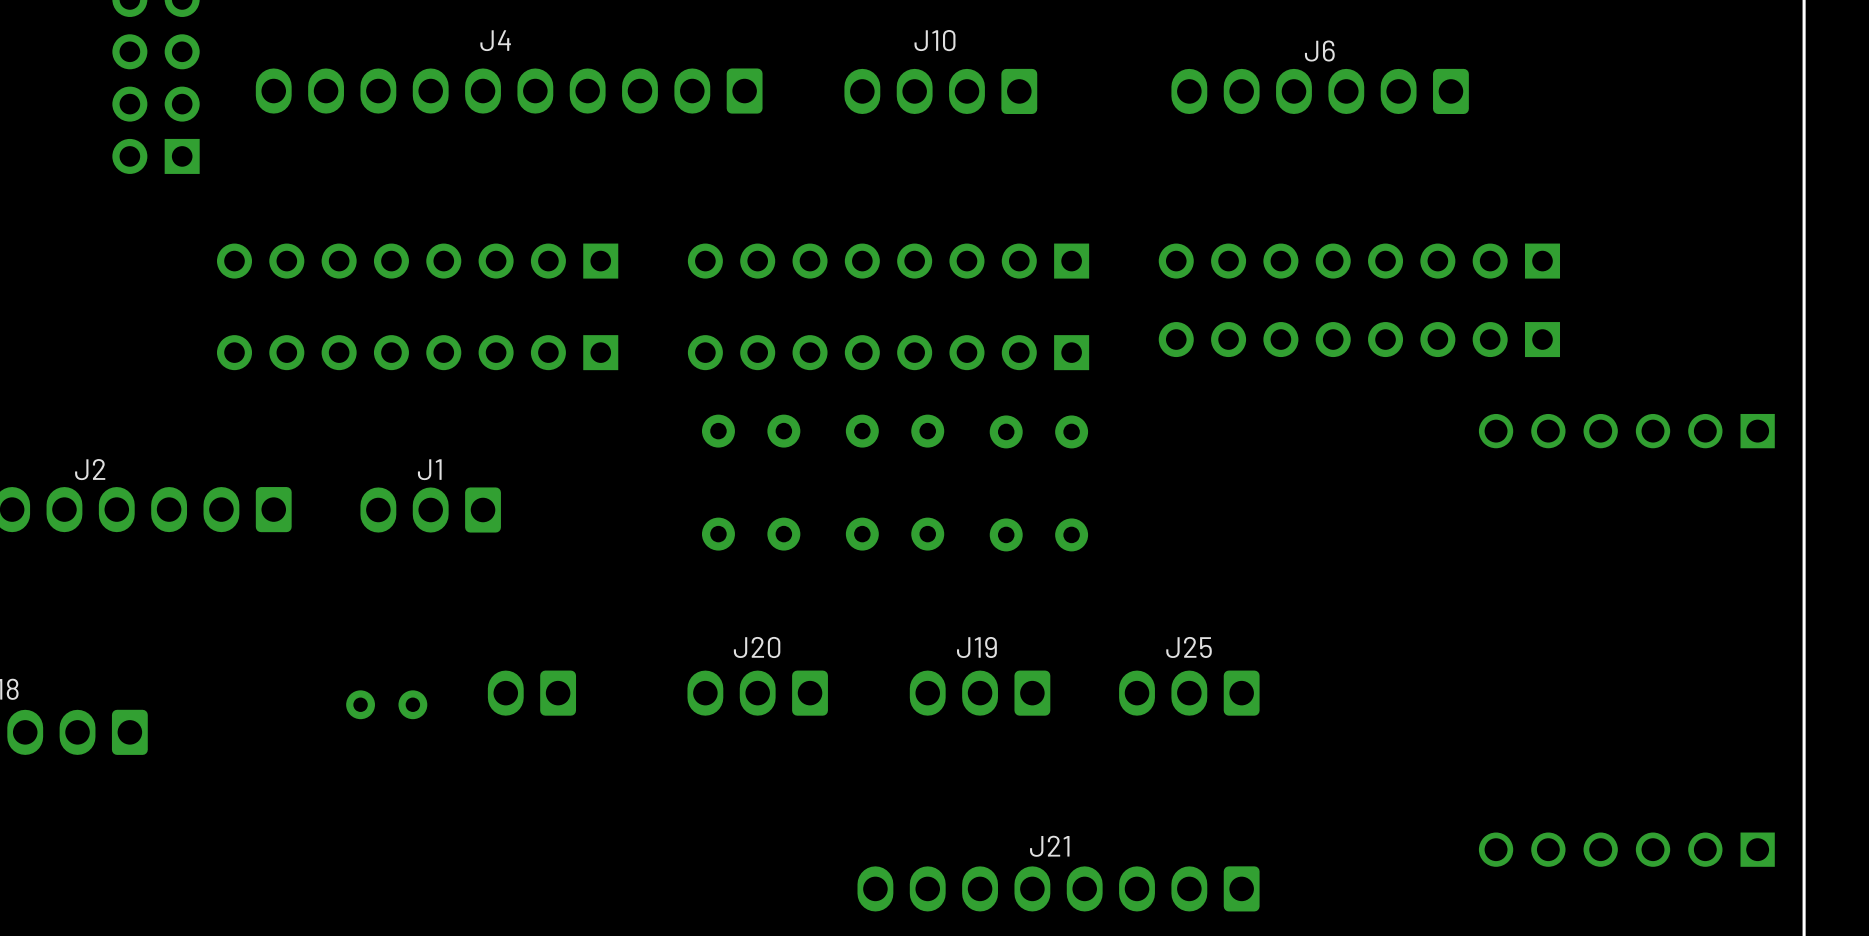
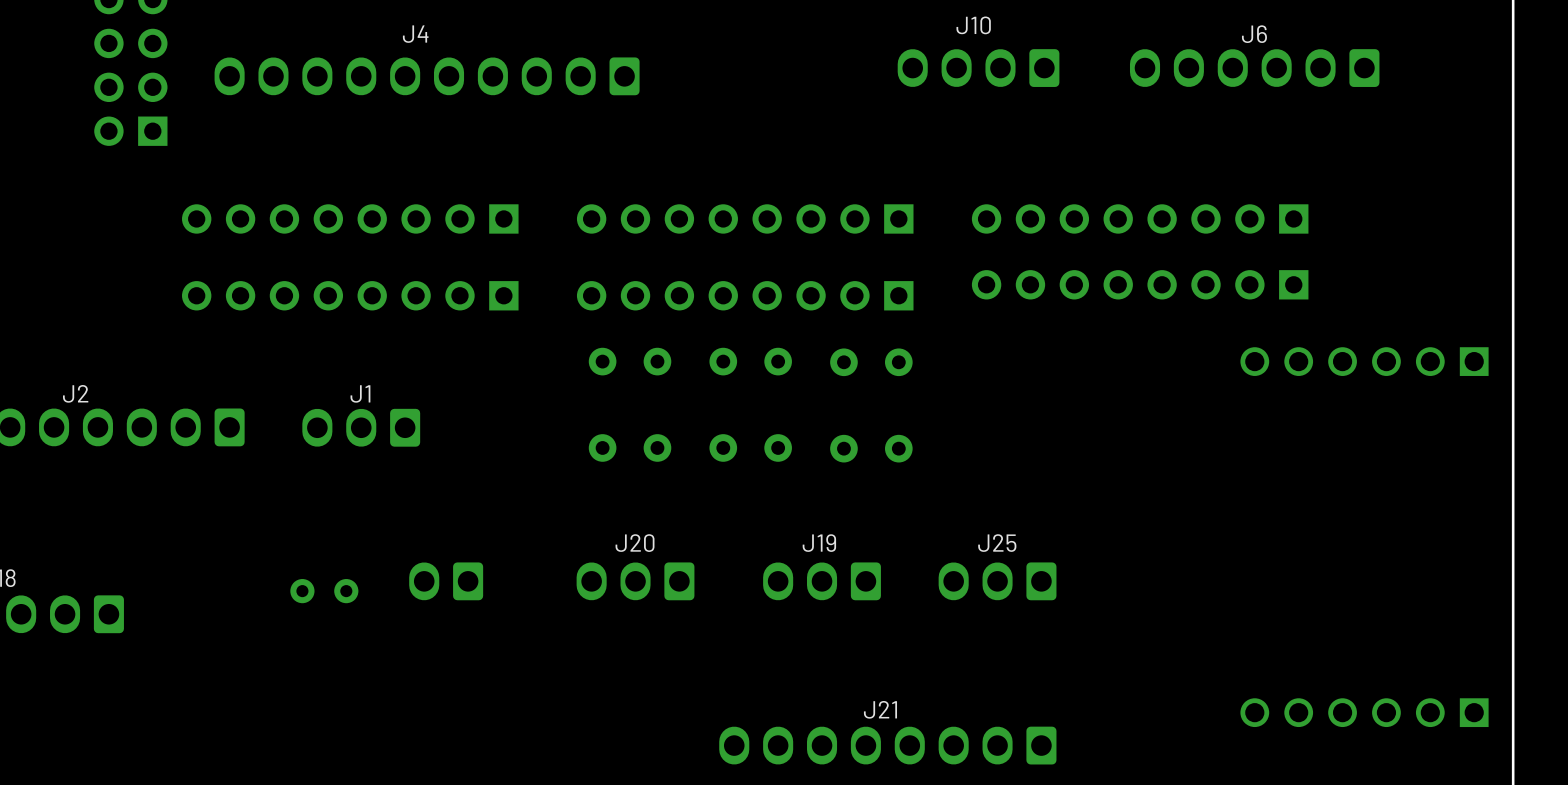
J10 position: (940, 91) -> (978, 68)
J6 position: (1320, 91) -> (1254, 68)

